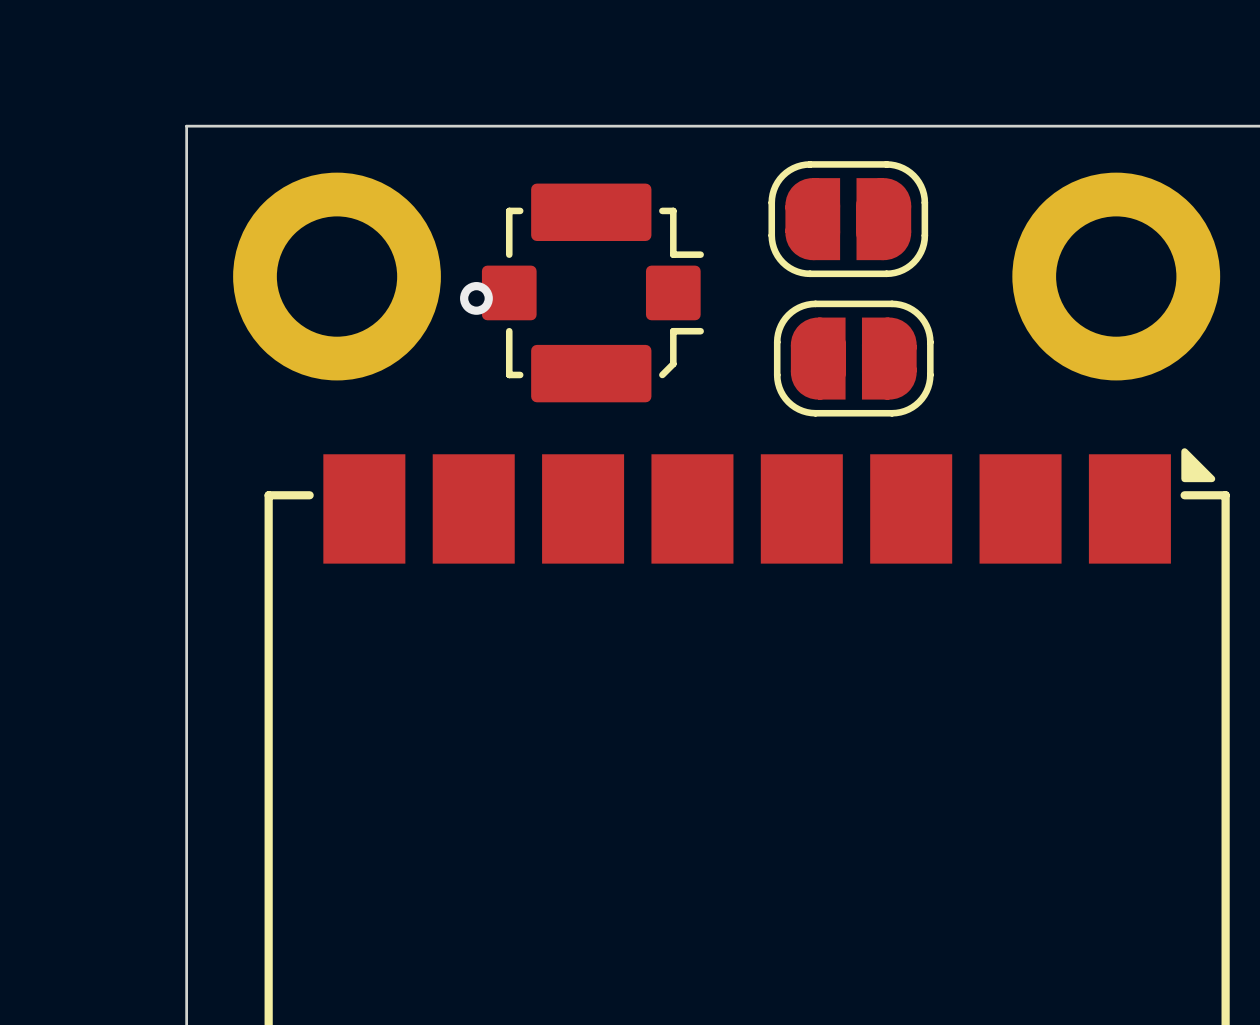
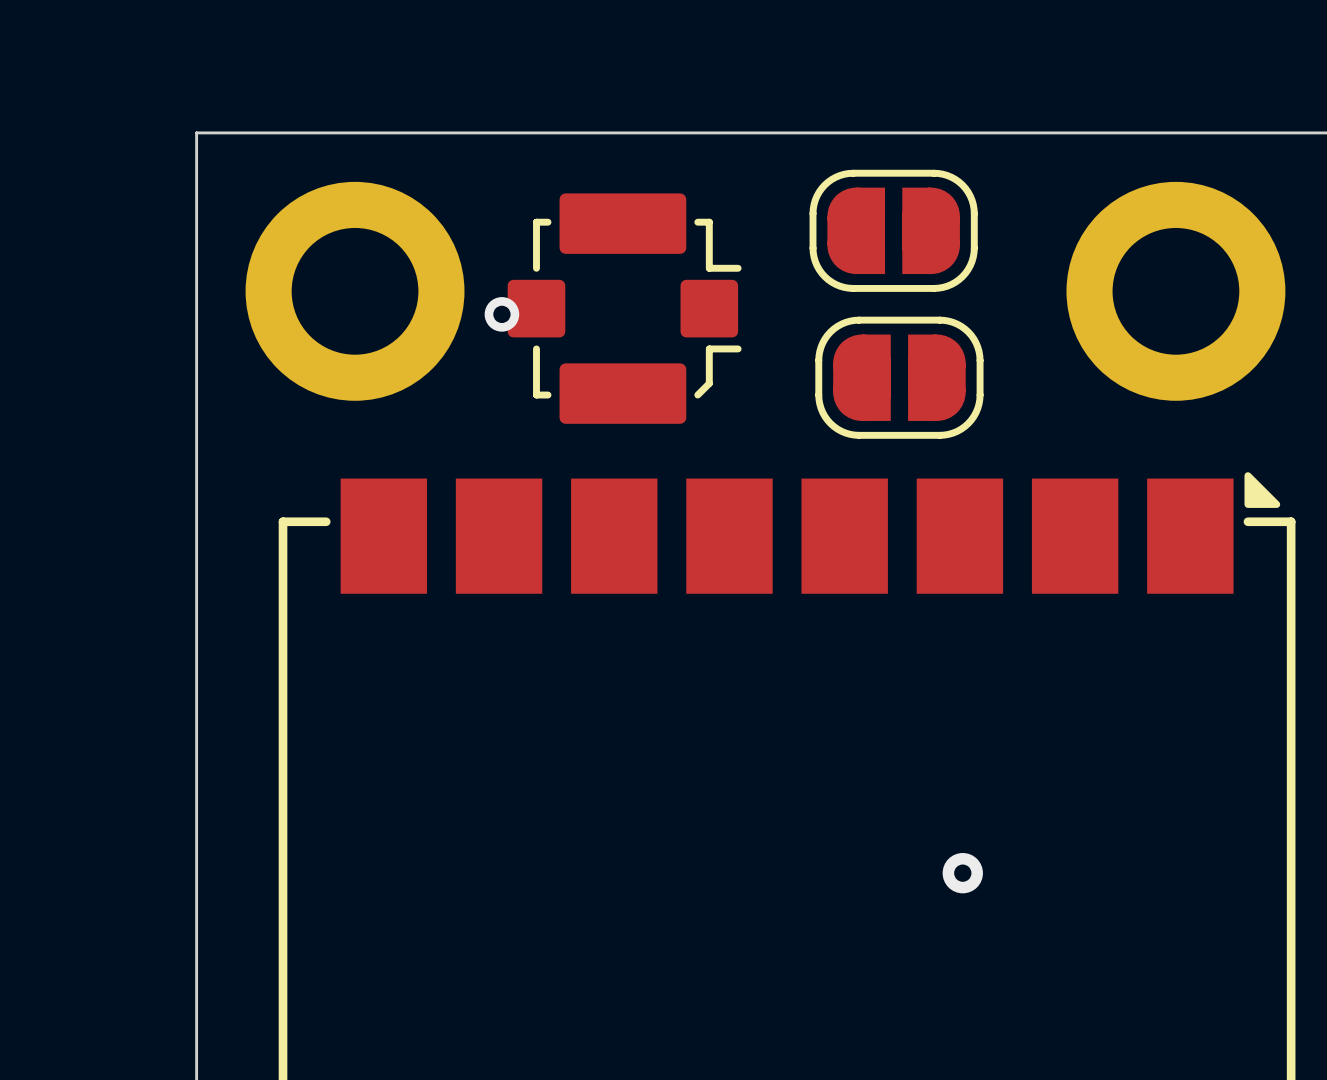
via: none -> (962, 873)

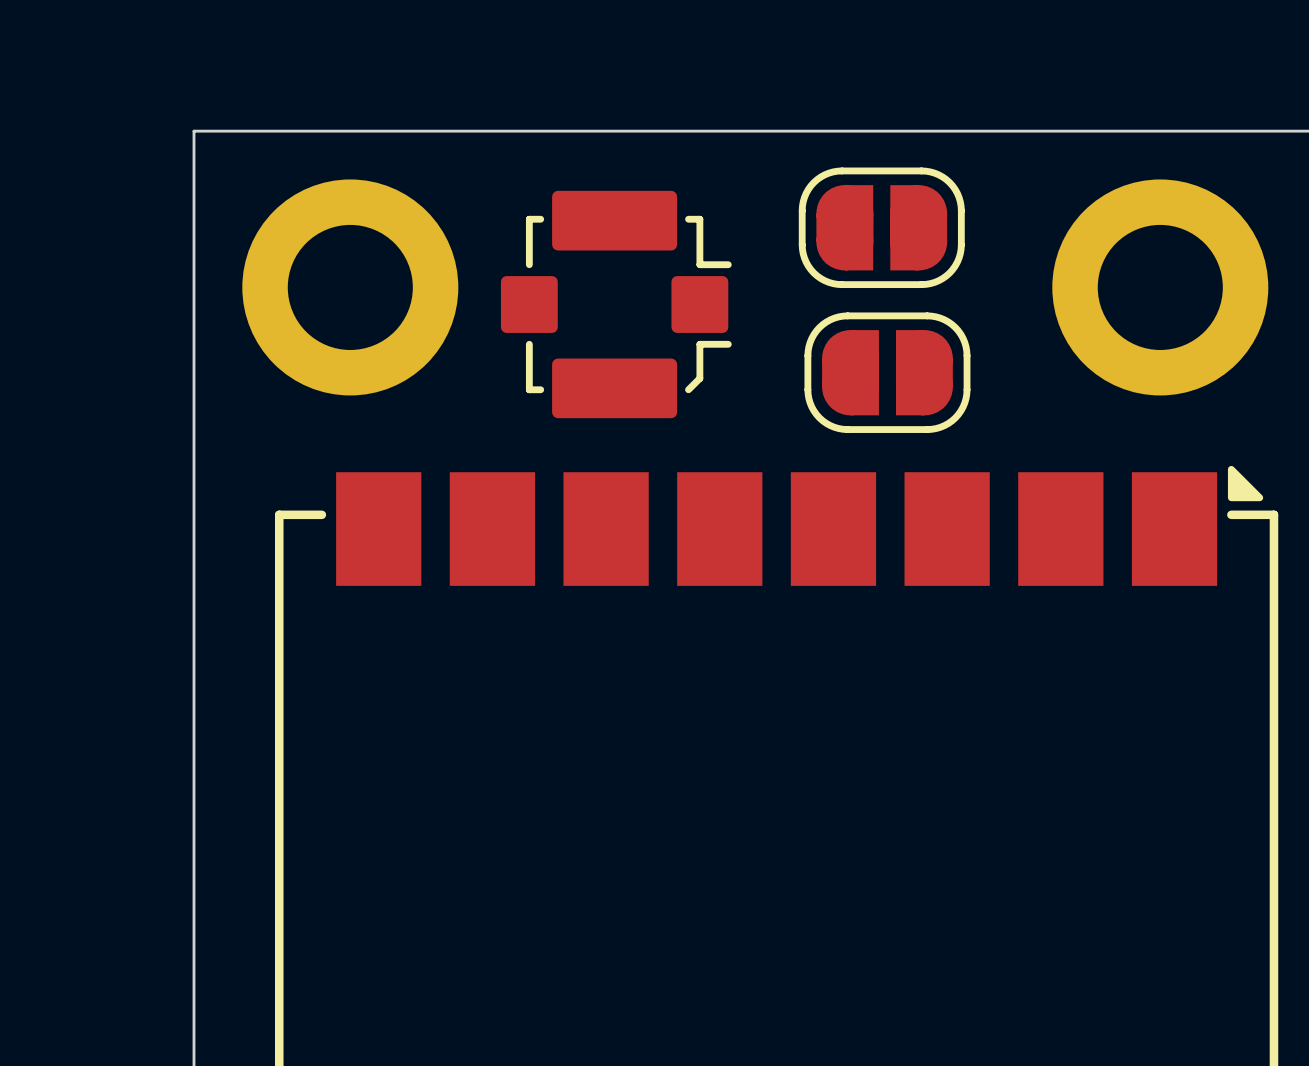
via: (501, 314) -> none
via: (962, 873) -> none

